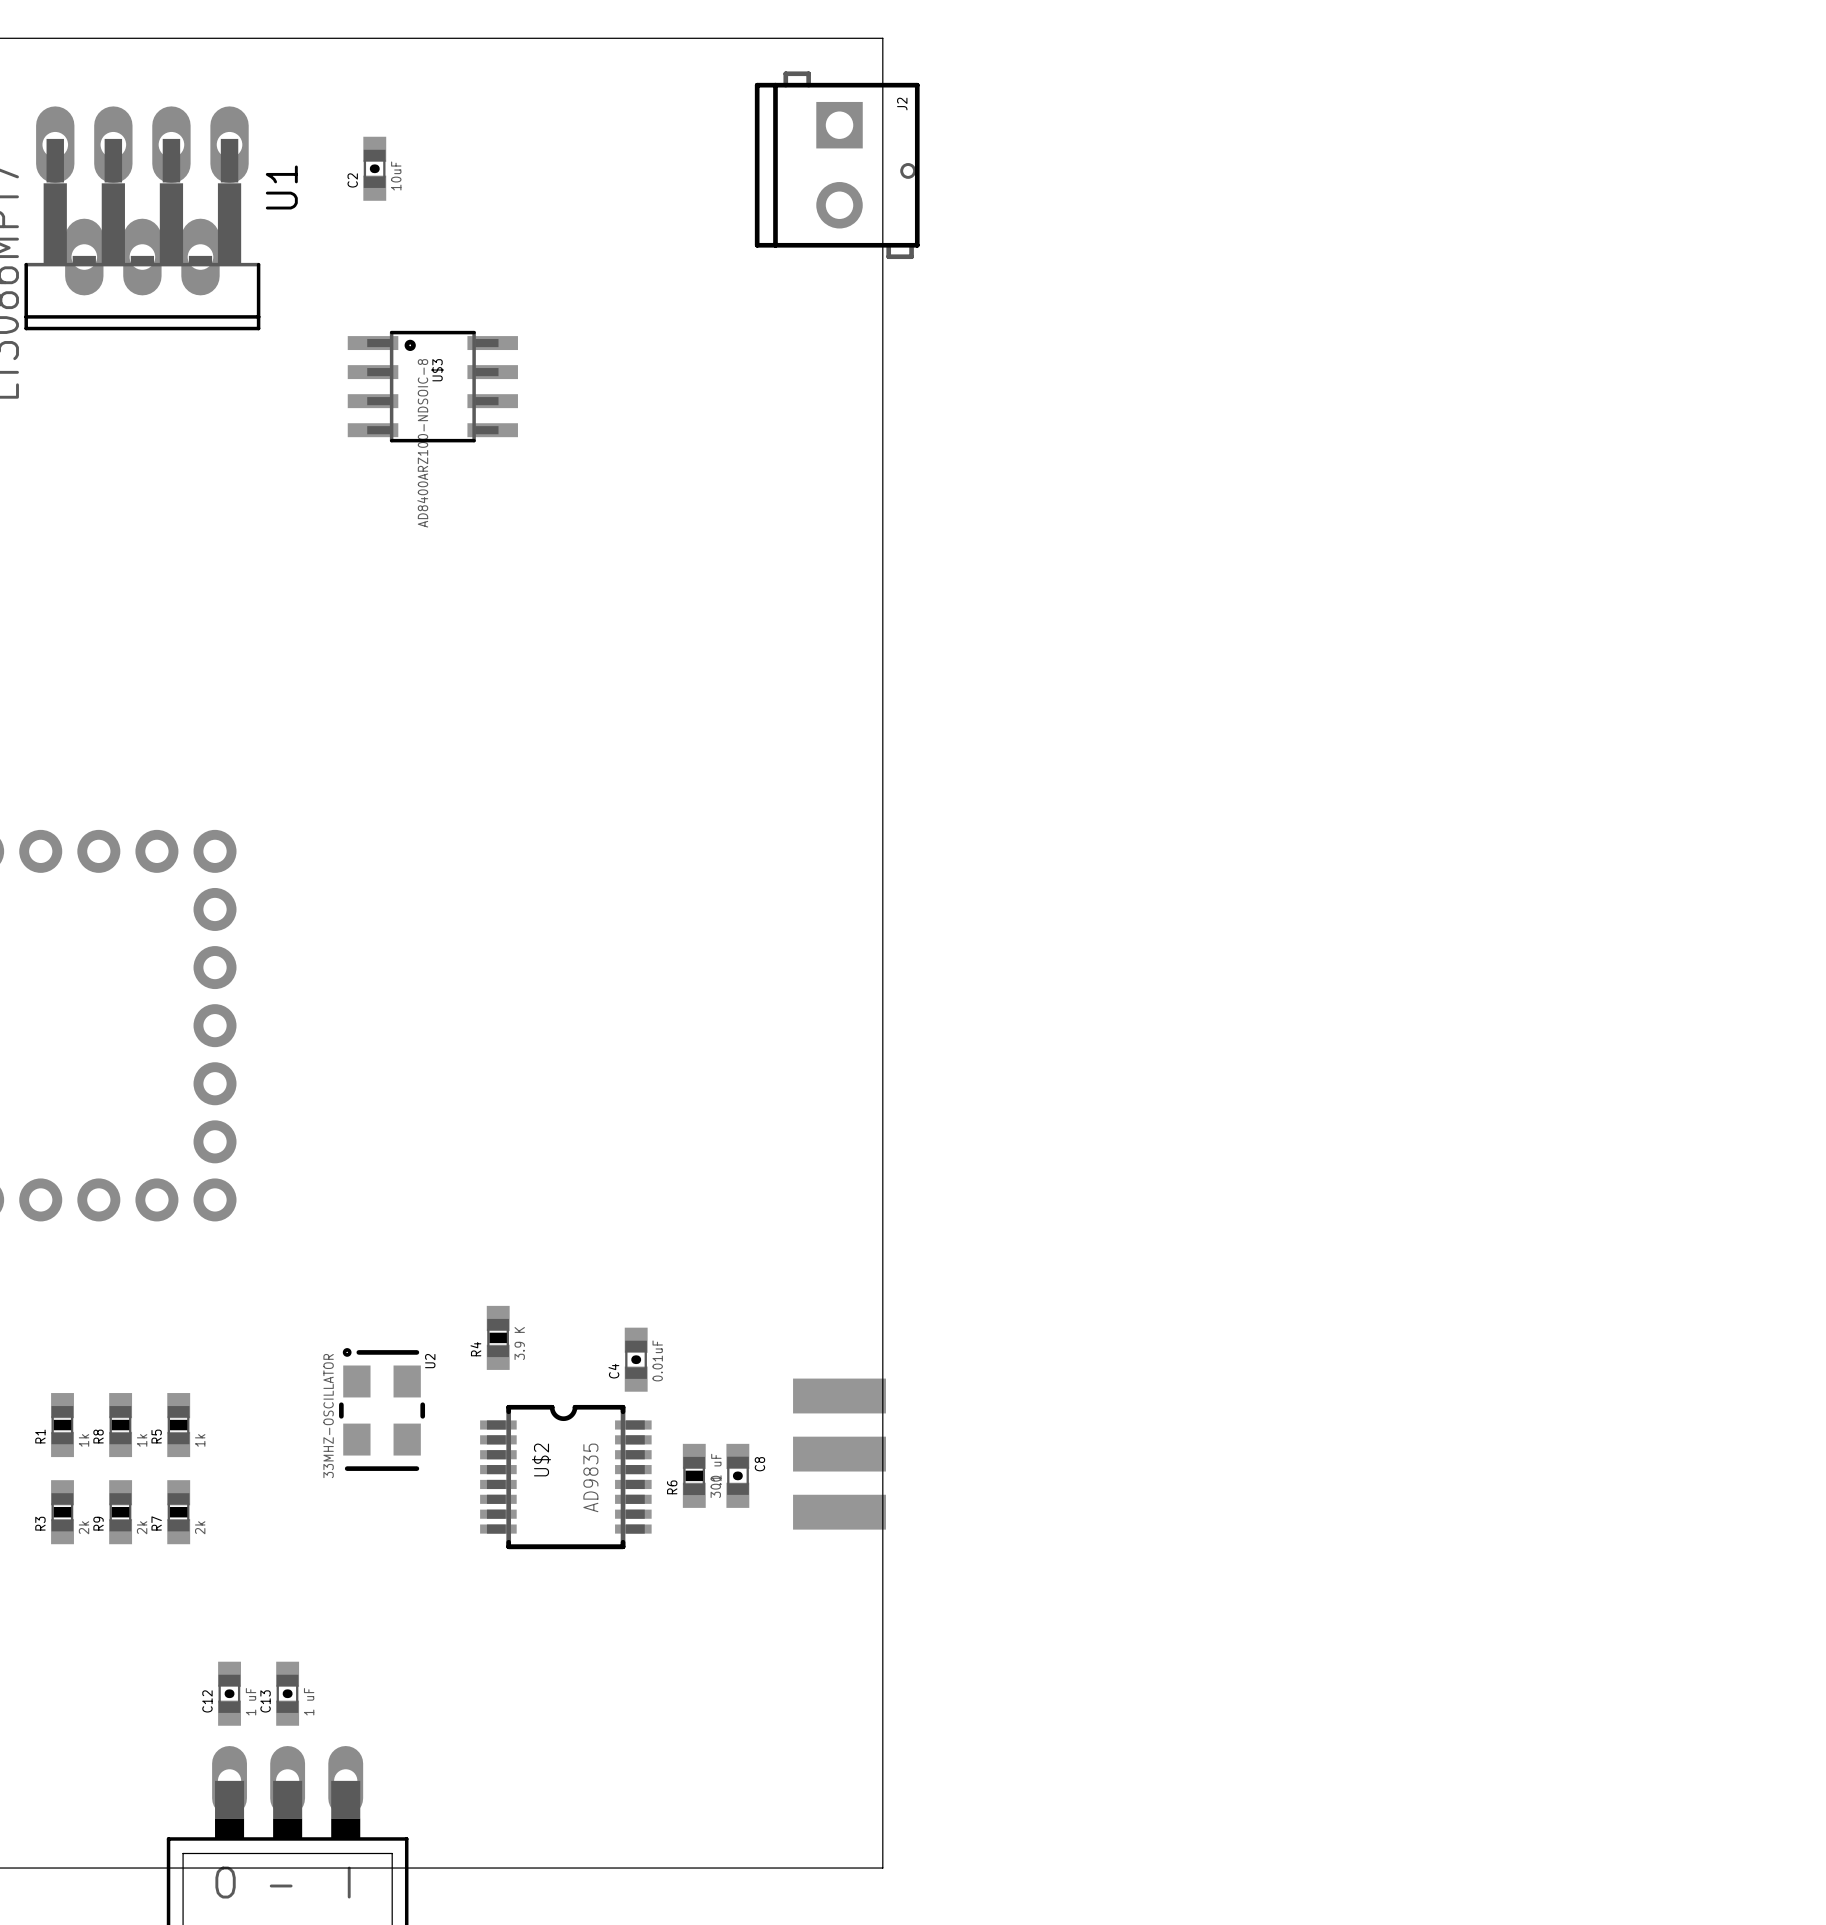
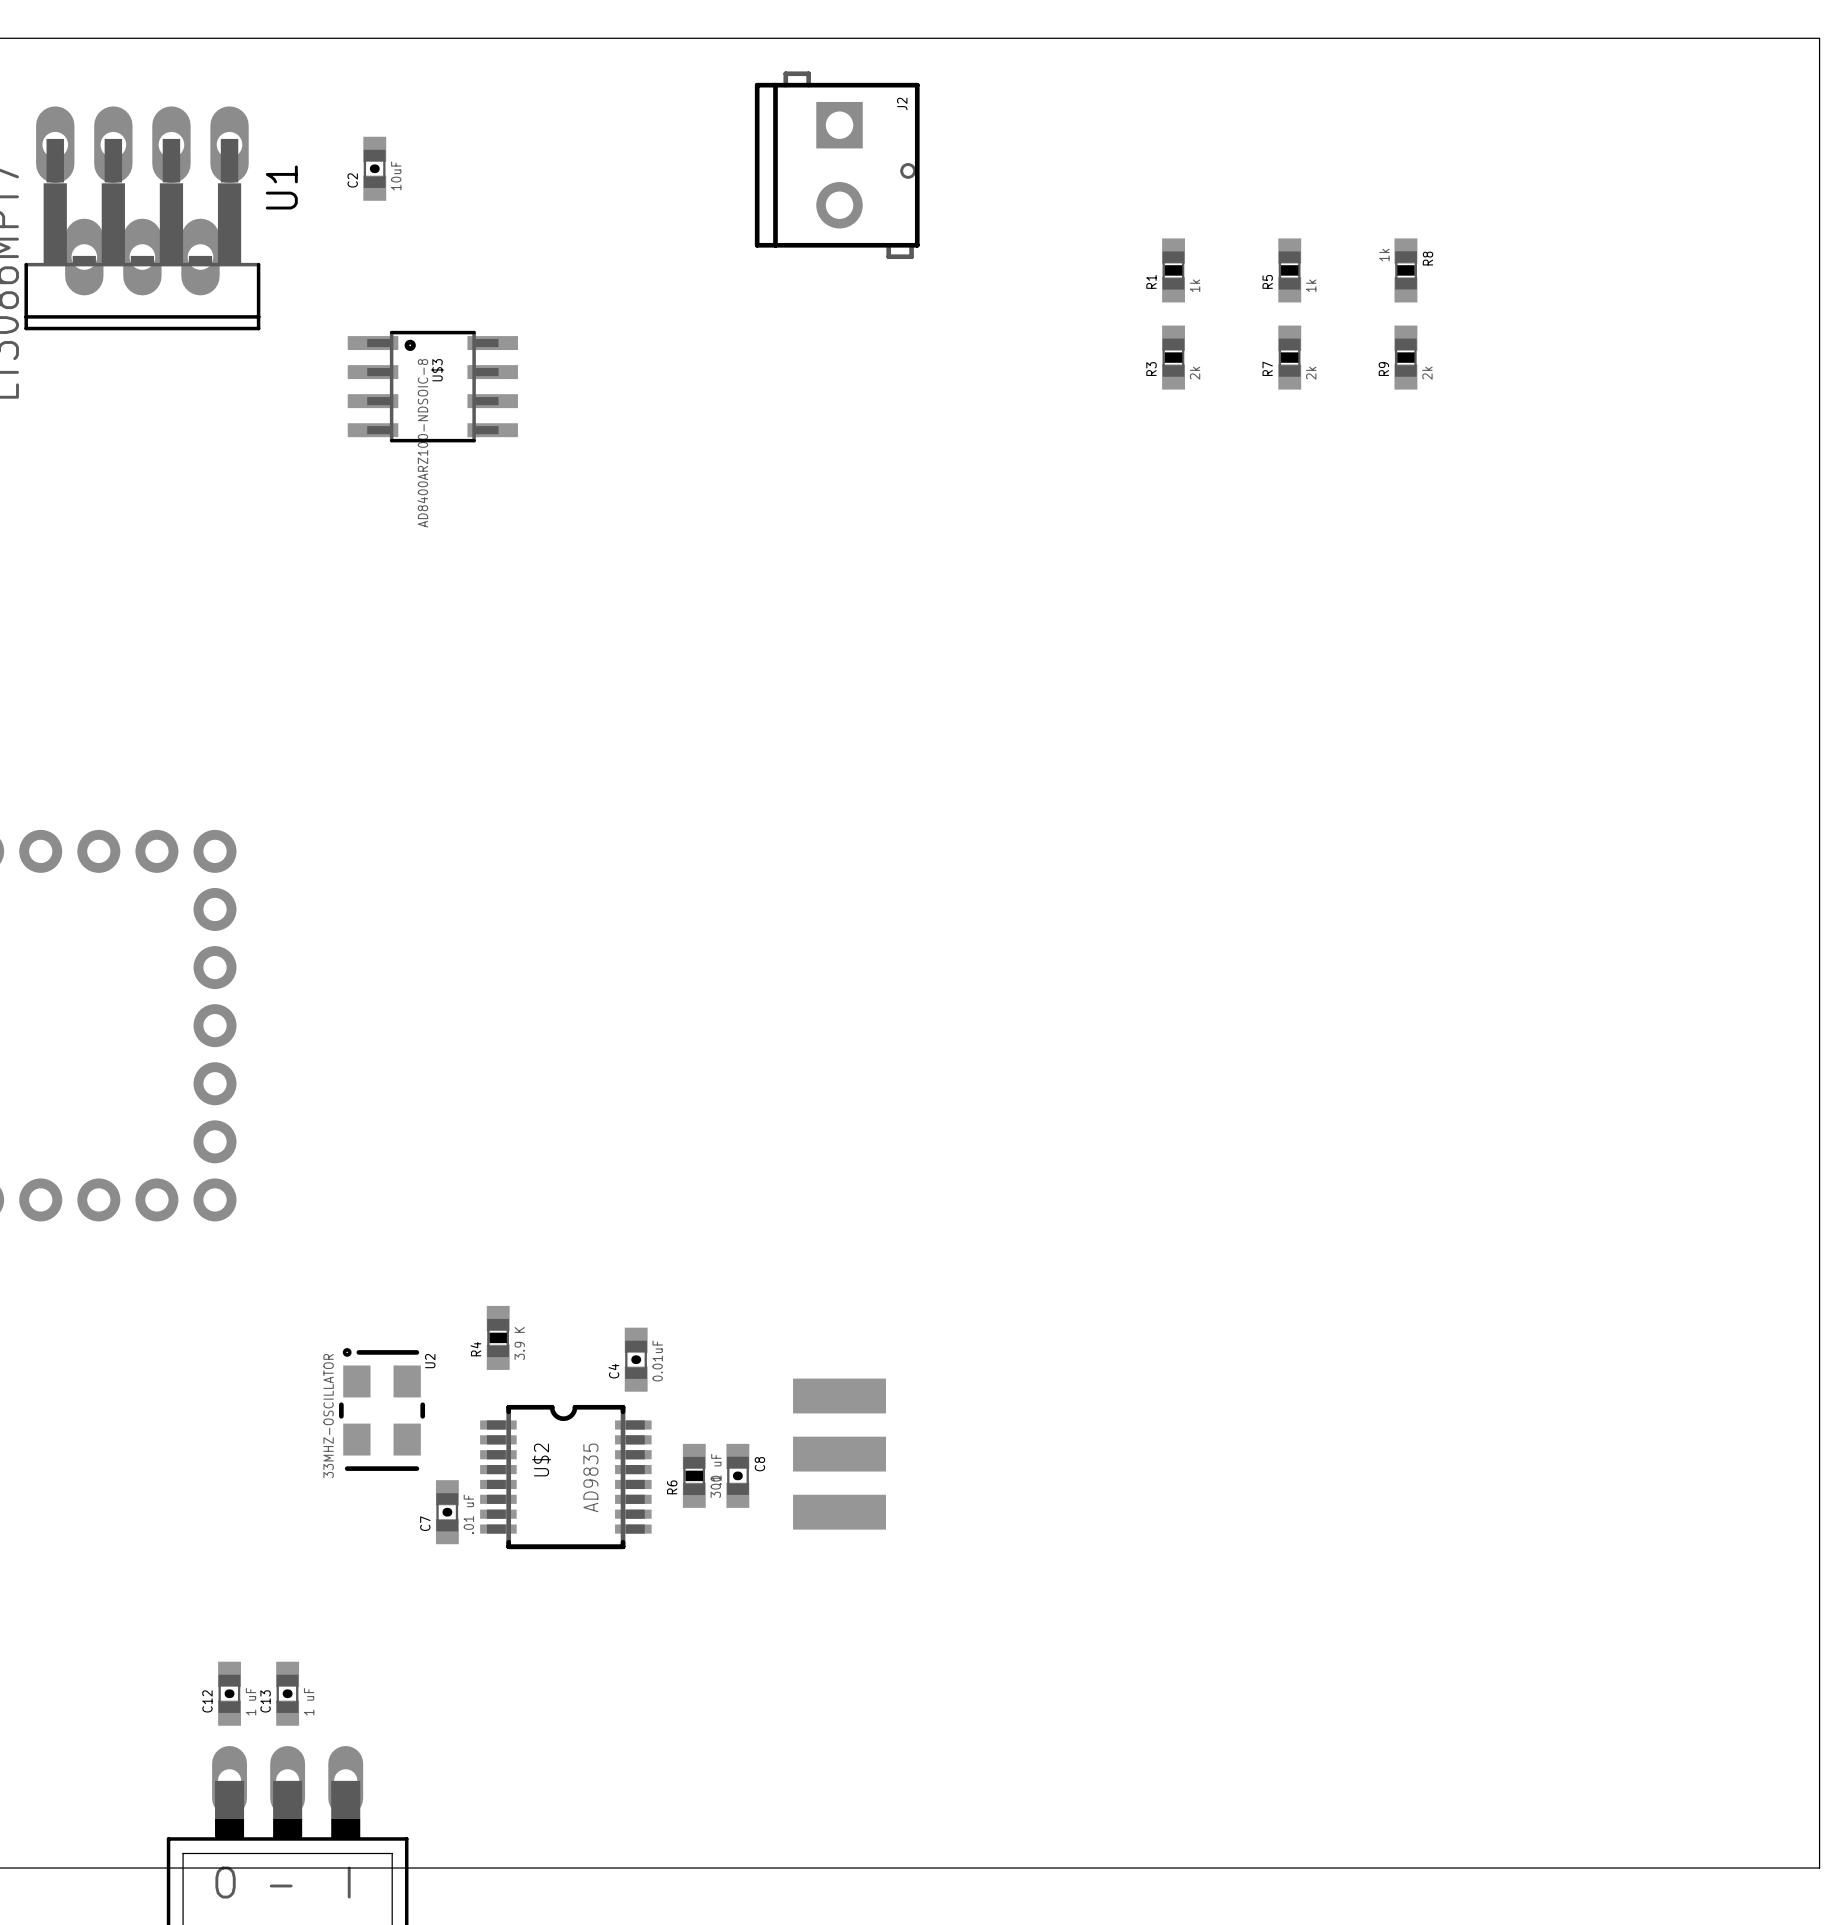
board edge: (882, 38) (882, 1868) -> (882, 38) (1819, 38) (1819, 1868) (882, 1868)
R1 position: (62, 1425) -> (1173, 270)
R8 position: (120, 1425) -> (1405, 270)
R5 position: (178, 1425) -> (1289, 270)
R8 name position: R8 (98, 1436) -> R8 (1428, 258)
R8 value position: 1k (142, 1440) -> 1k (1384, 255)
R3 position: (62, 1512) -> (1173, 357)
R9 position: (120, 1512) -> (1405, 357)
R7 position: (178, 1512) -> (1289, 357)
C7: none -> .01 uF (447, 1512)

